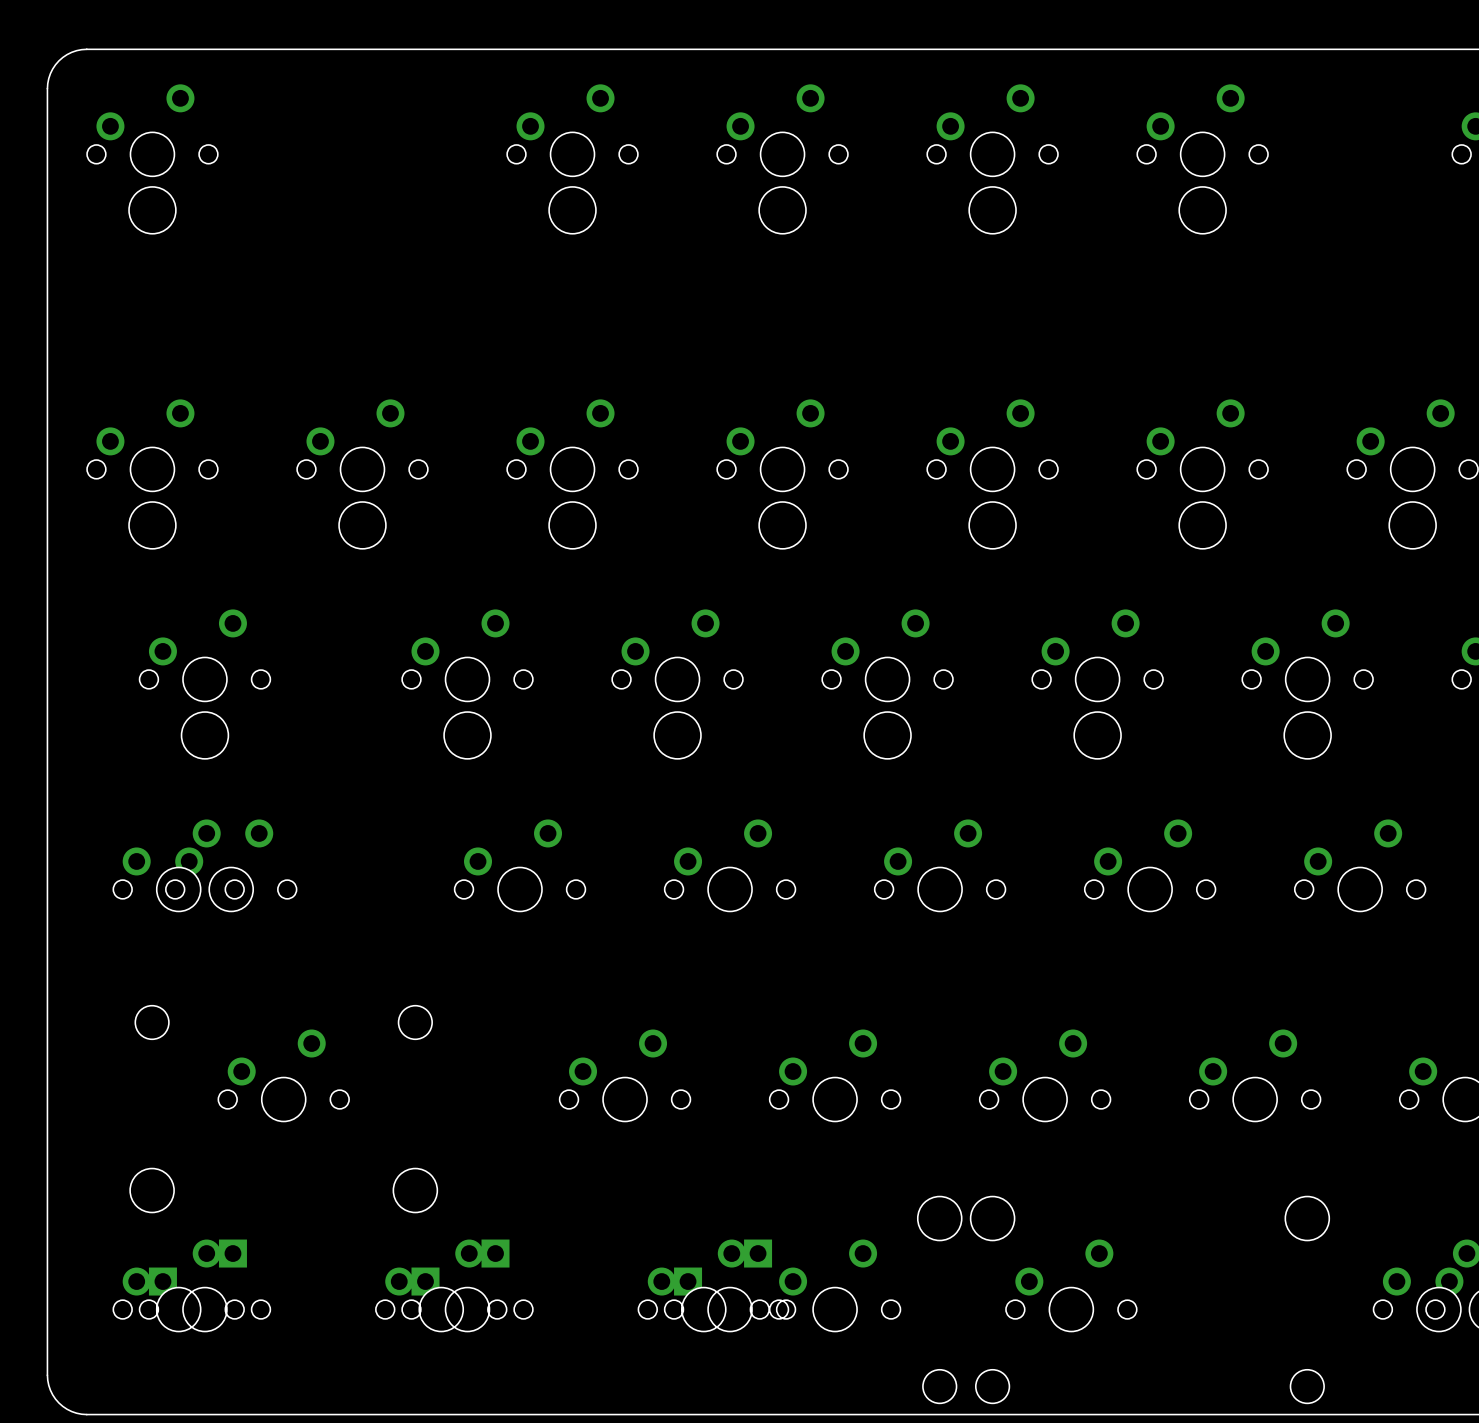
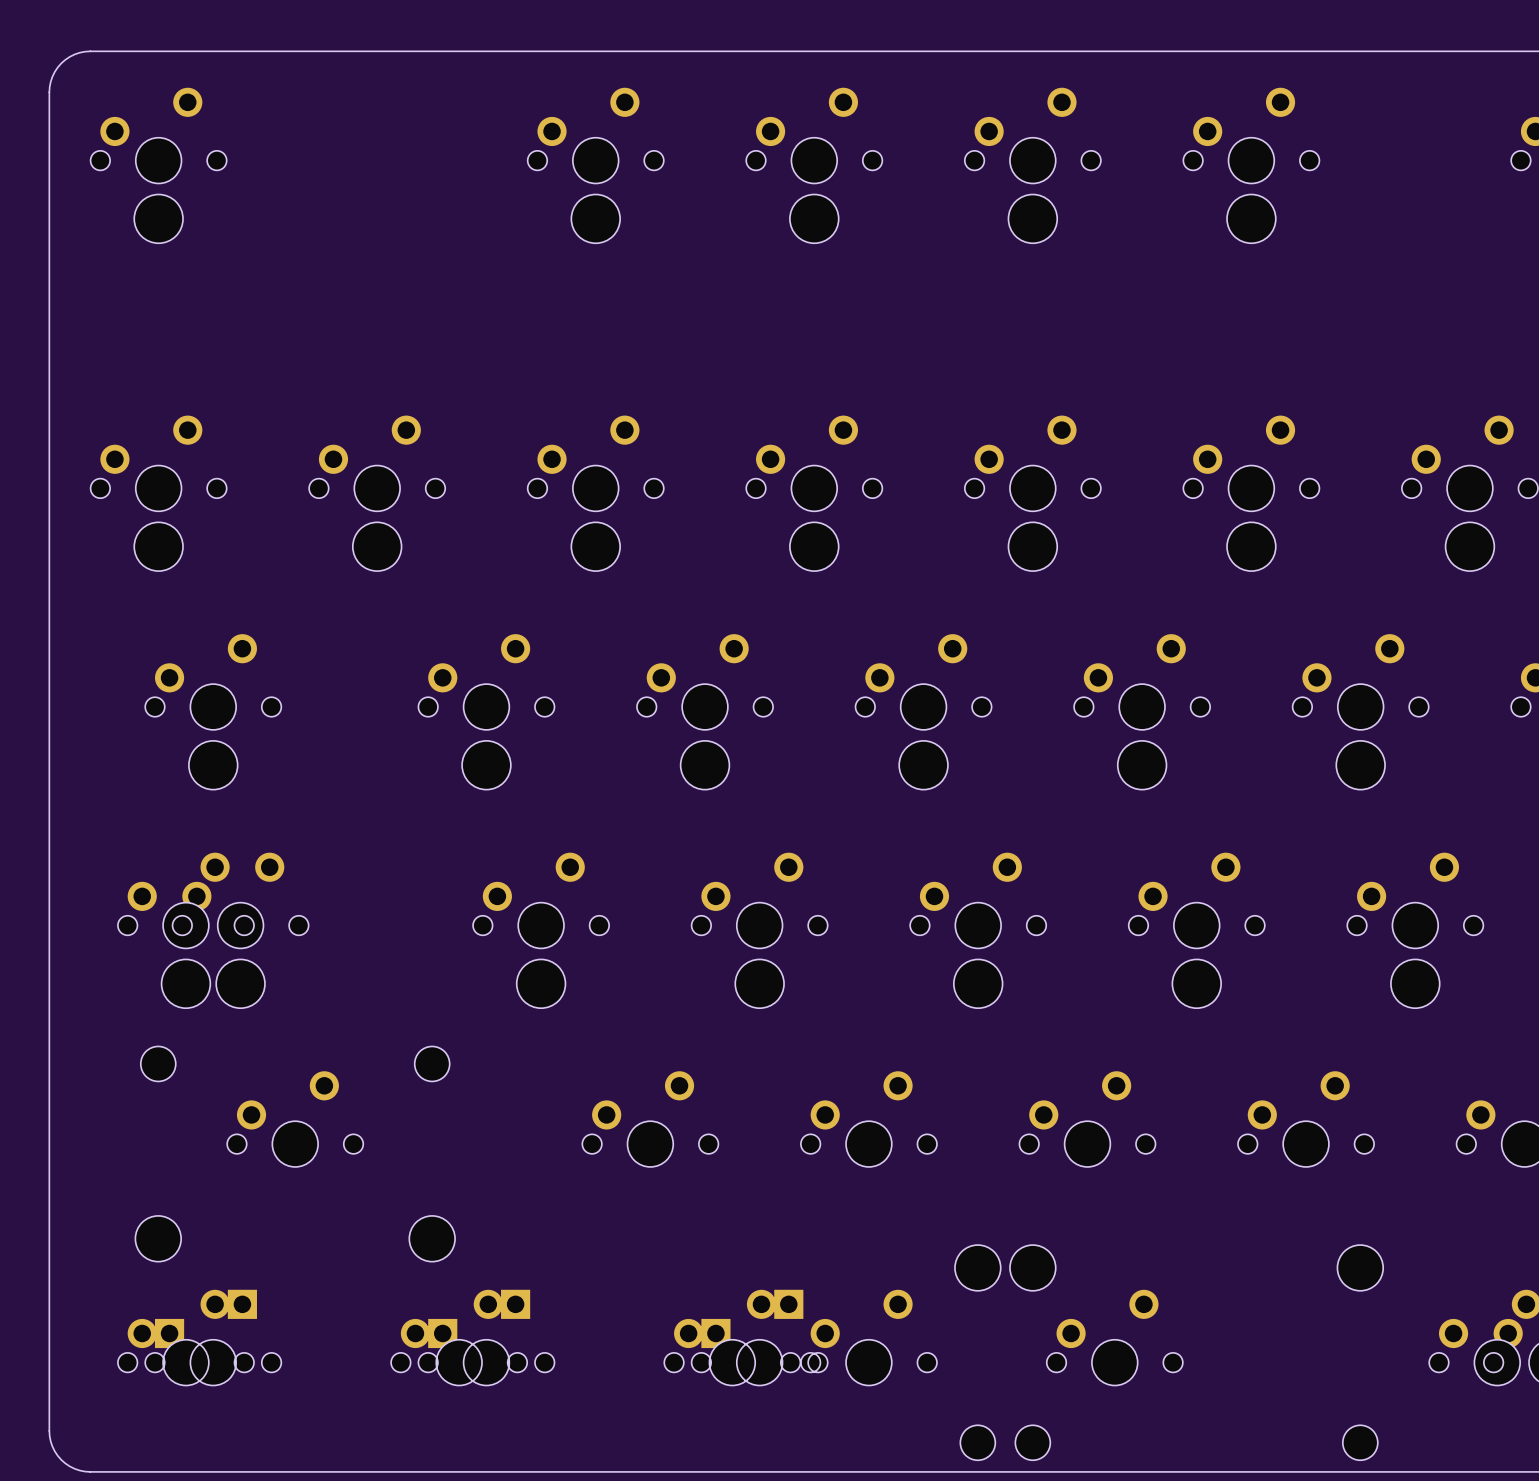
part: none -> (185, 983)
part: none -> (240, 983)
part: none -> (541, 983)
part: none -> (759, 983)
part: none -> (978, 983)
part: none -> (1196, 983)
part: none -> (1415, 983)

